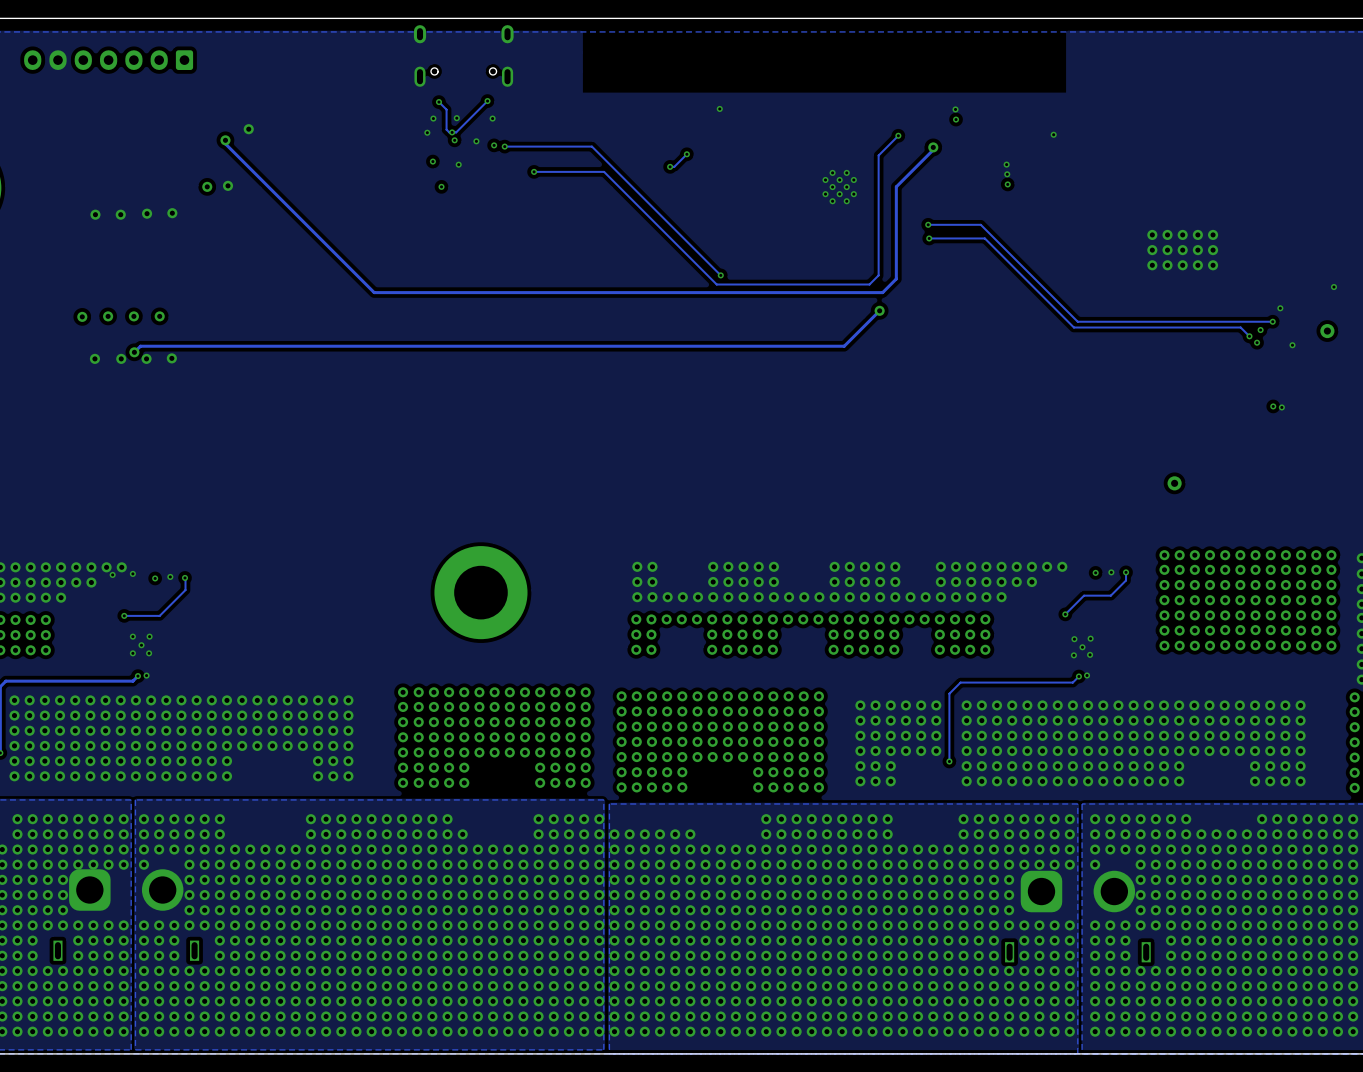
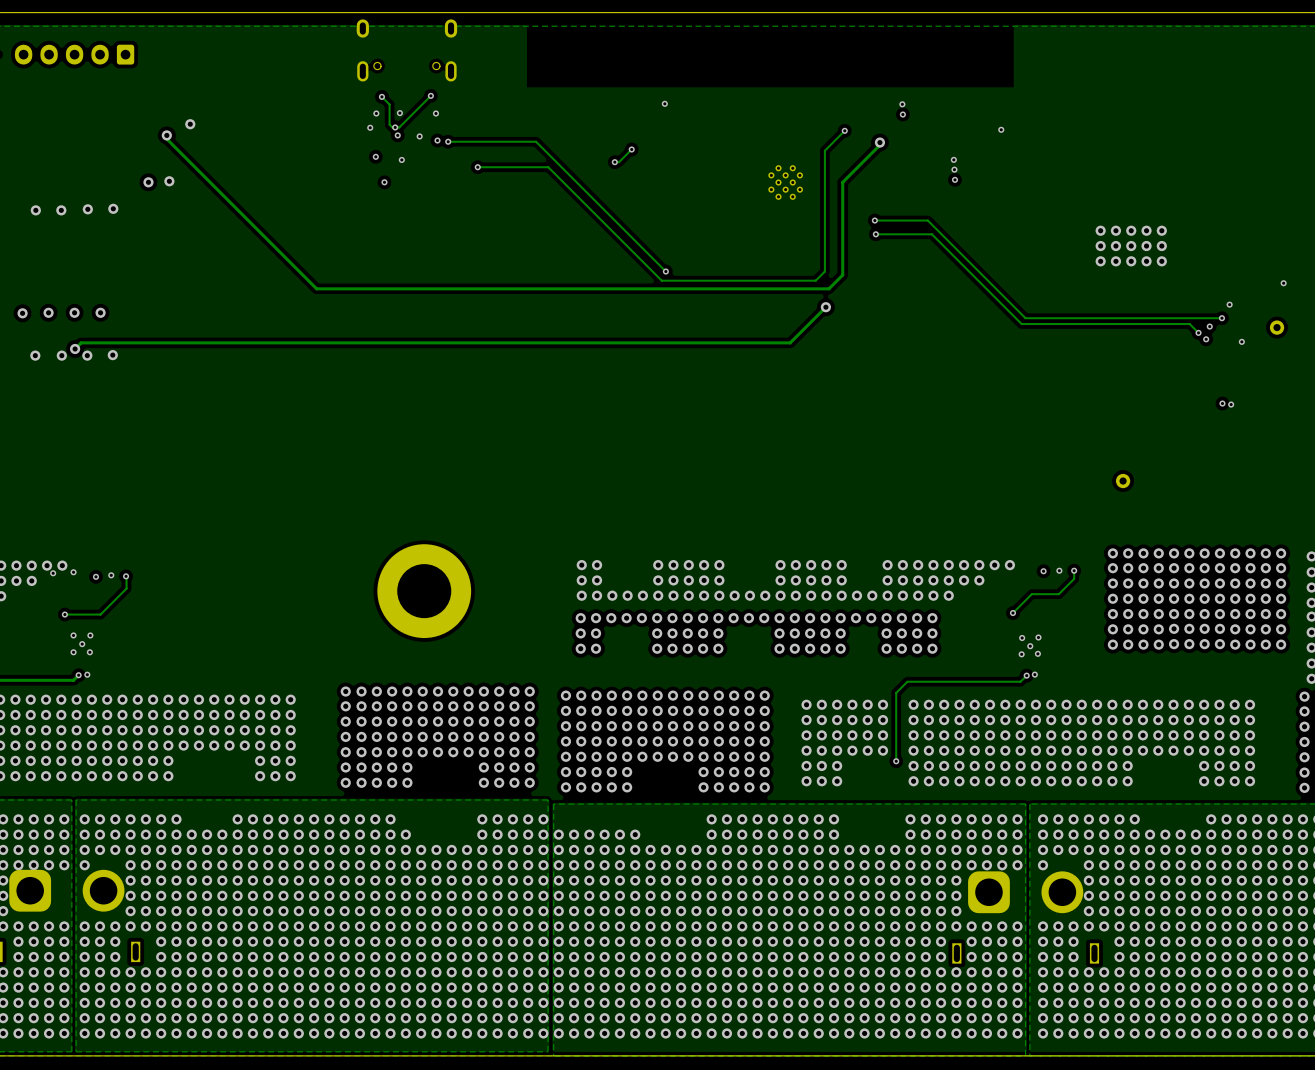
via: none -> (176, 819)
via: none -> (237, 819)
via: none -> (176, 834)
via: none -> (191, 834)
via: none -> (207, 834)
via: none -> (222, 834)
via: none -> (237, 834)

